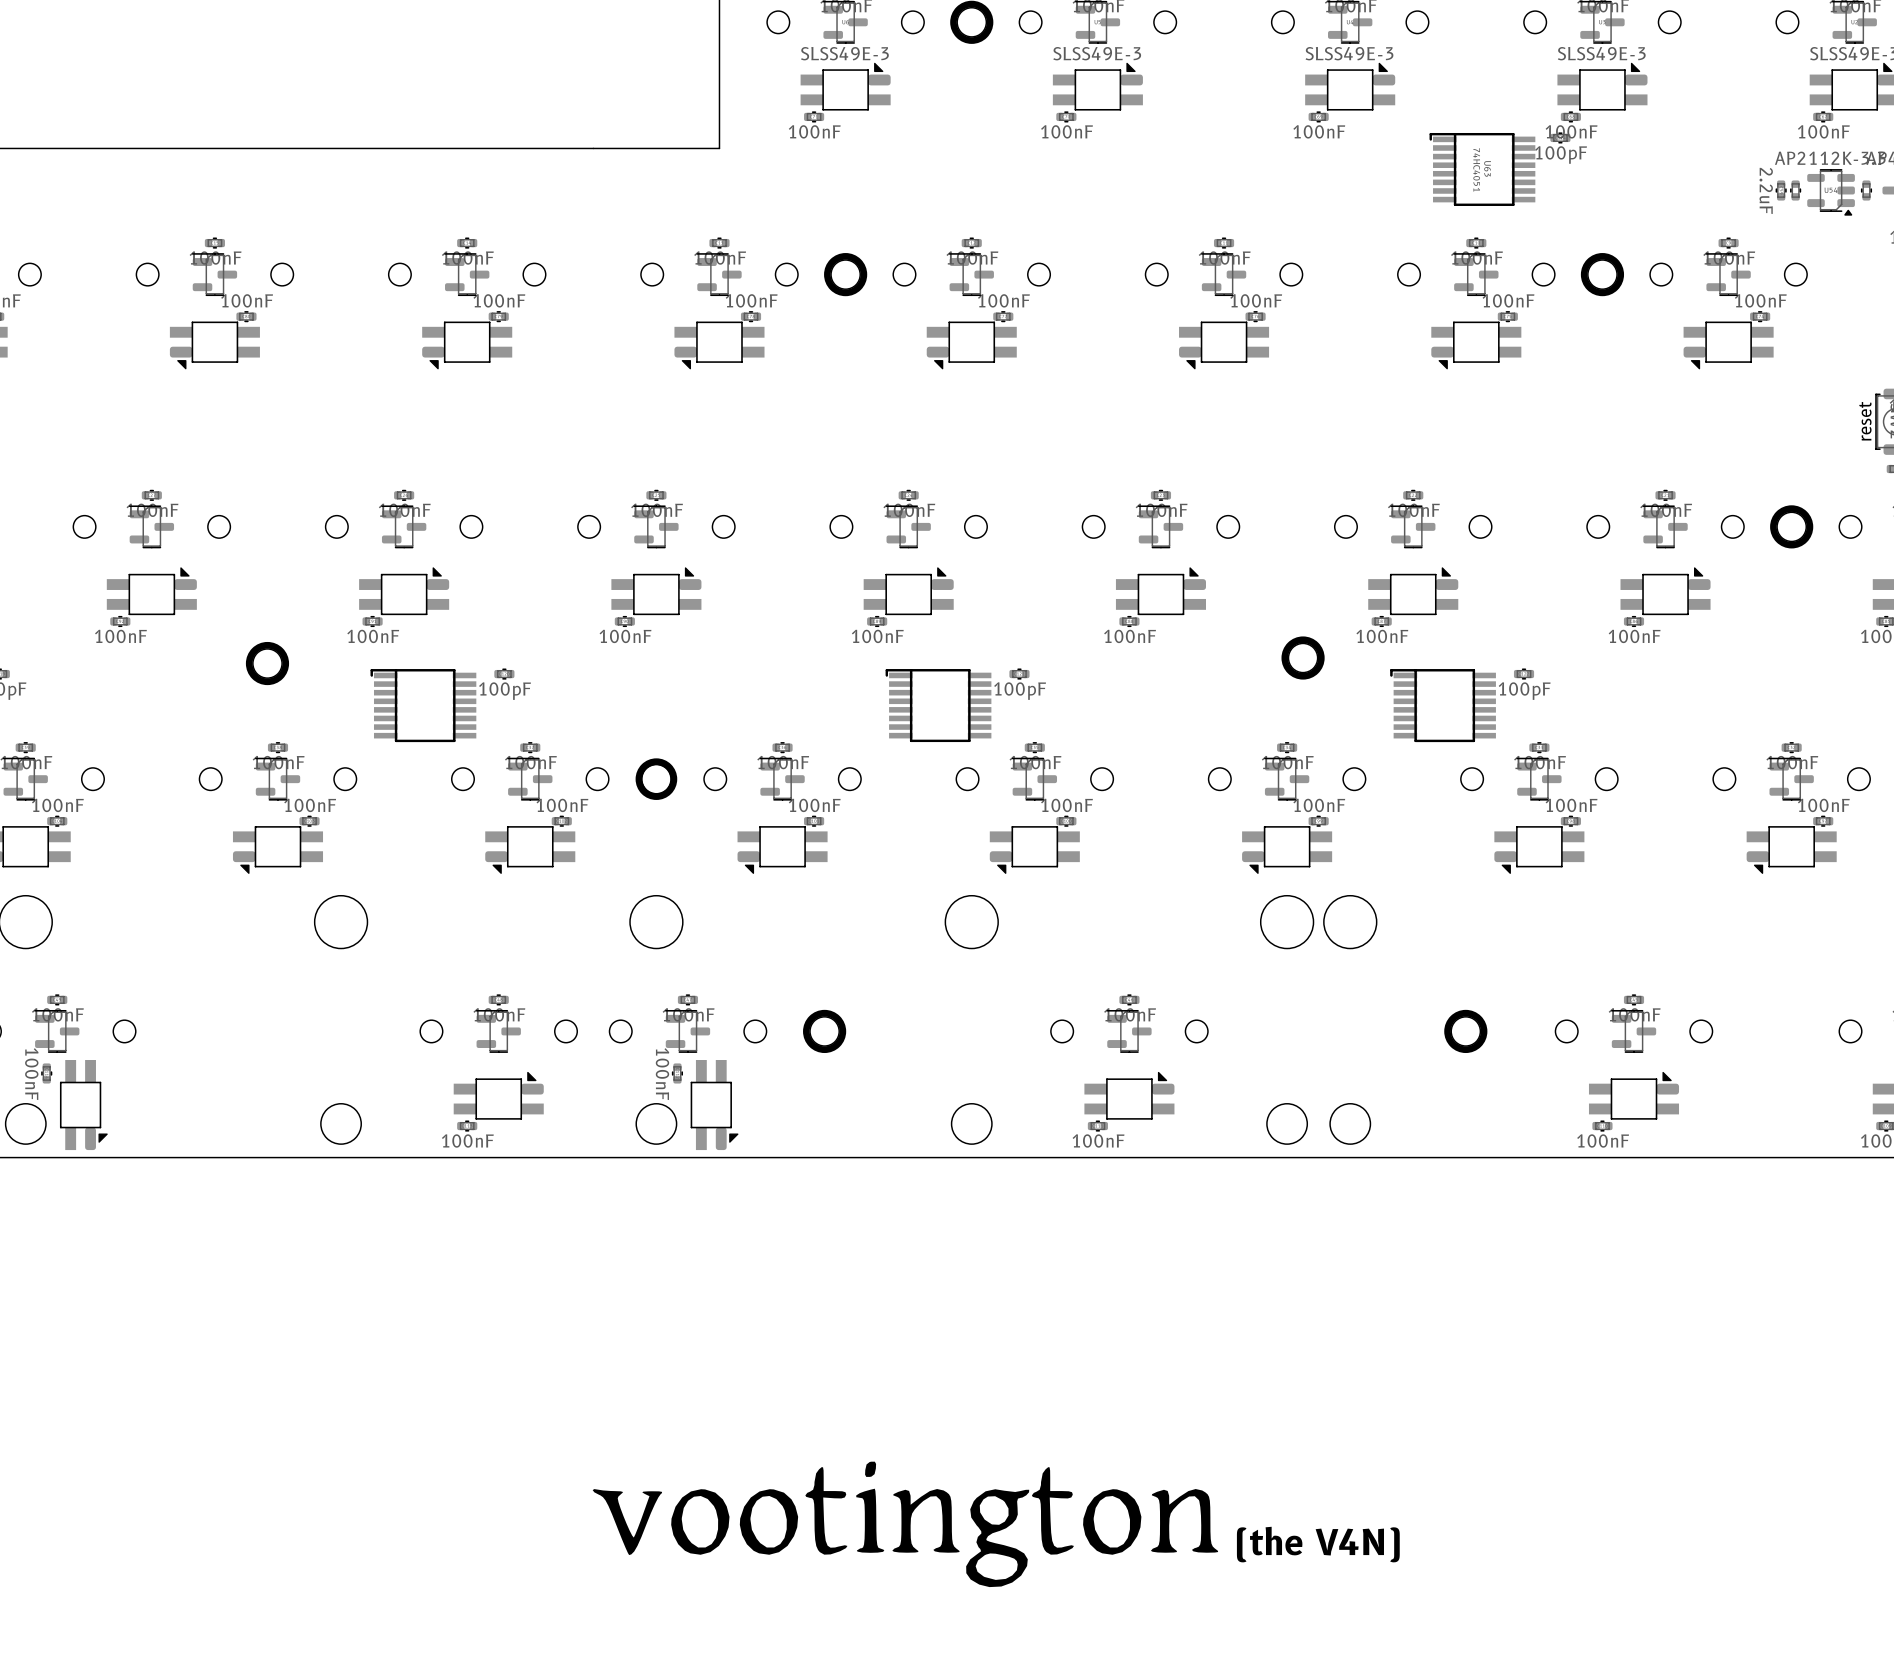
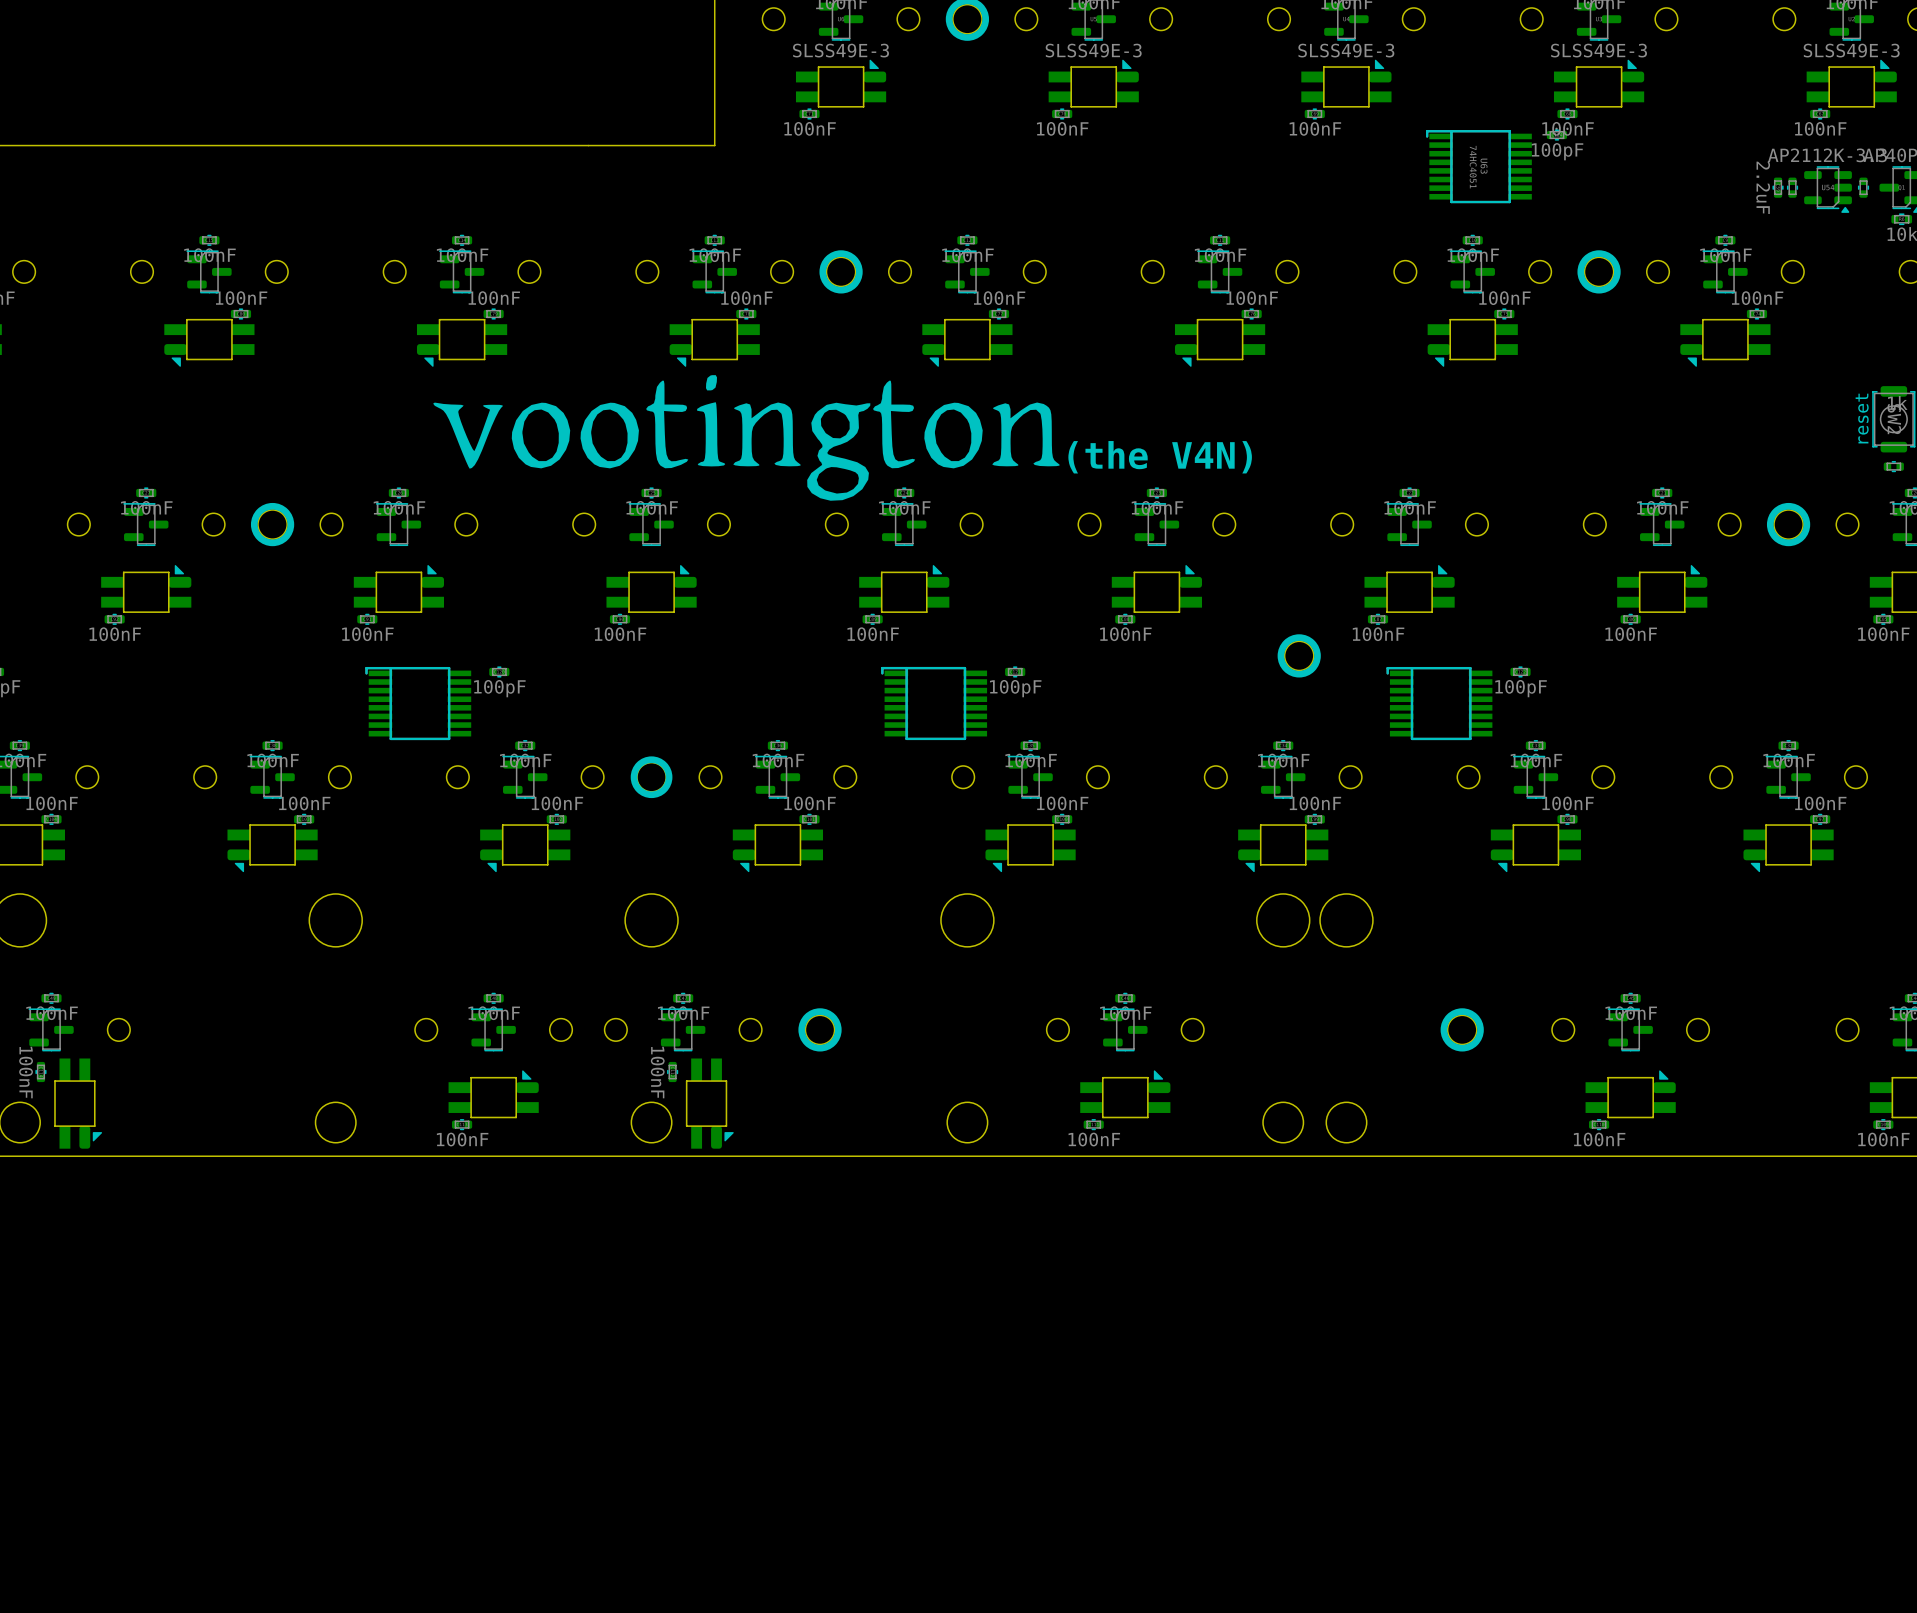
drawing: none -> [433, 375, 1060, 501]
text: none -> (the V4N) (1160, 457)
part position: (267, 663) -> (272, 524)
drawing: [592, 1461, 1219, 1588] -> none
text: (the V4N) (1318, 1544) -> none

